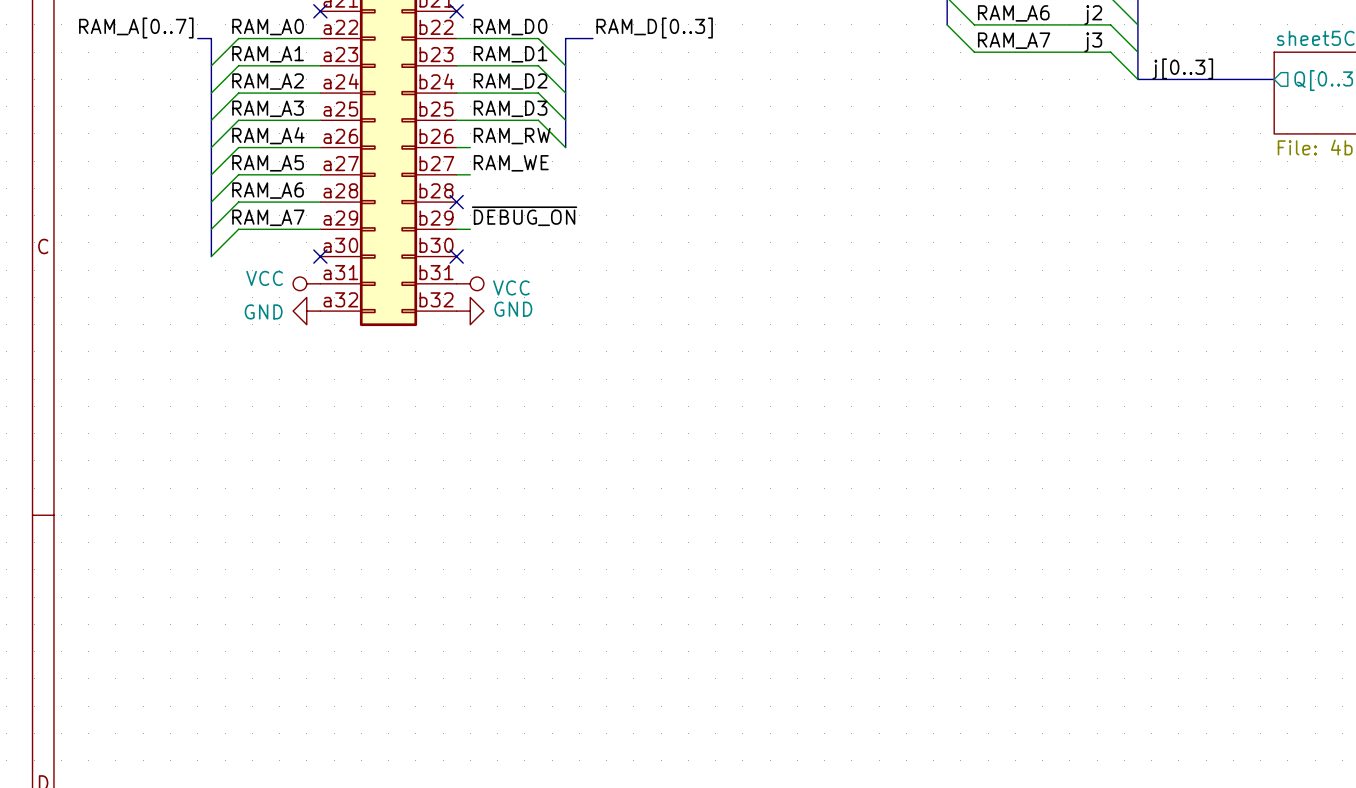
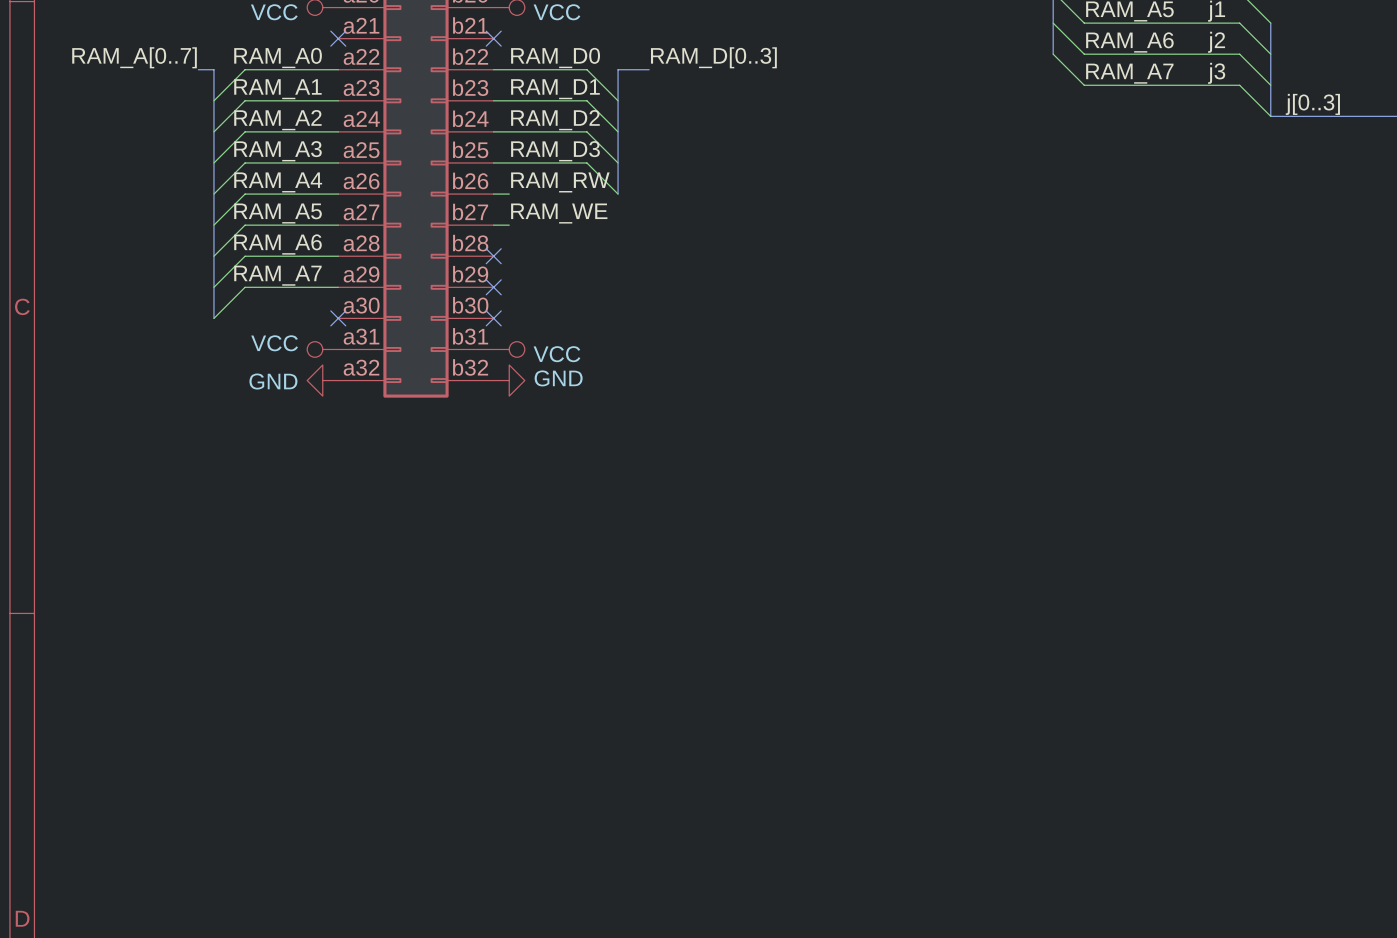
label: ~{DEBUG_ON} (524, 216) -> none
wire: (456, 229) (470, 229) -> none
no-connect mark: none -> (493, 287)

